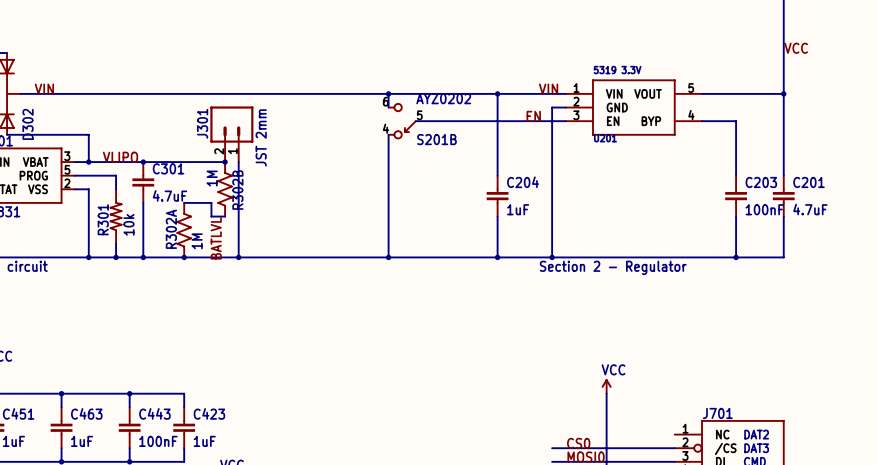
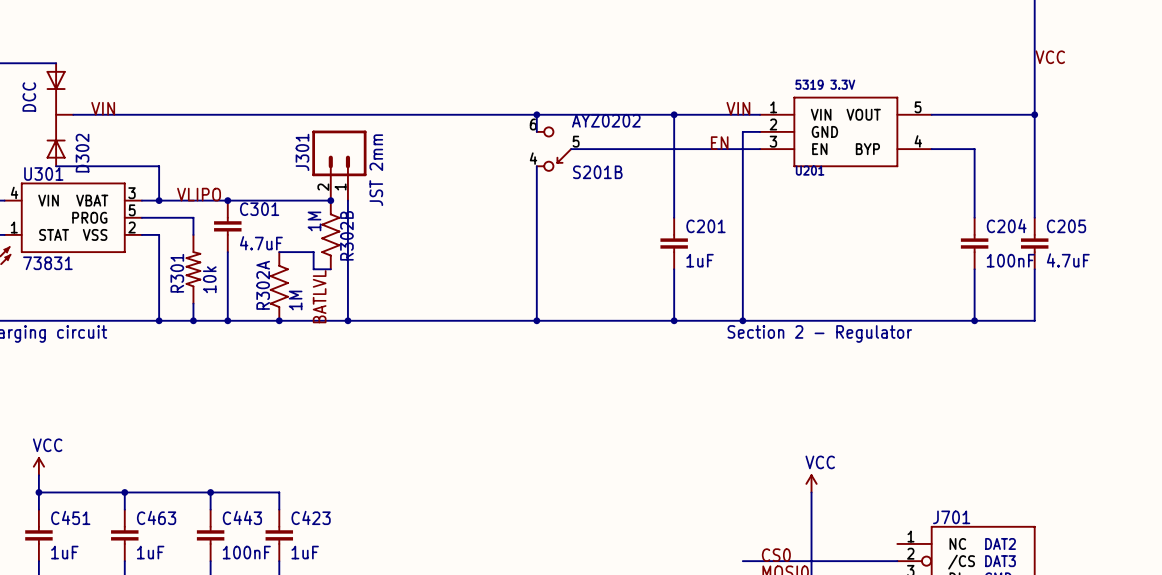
C204 name: C204 (523, 182) -> C201 (705, 226)
C203 name: C203 (761, 182) -> C204 (1006, 226)
C201 name: C201 (809, 182) -> C205 (1066, 226)

